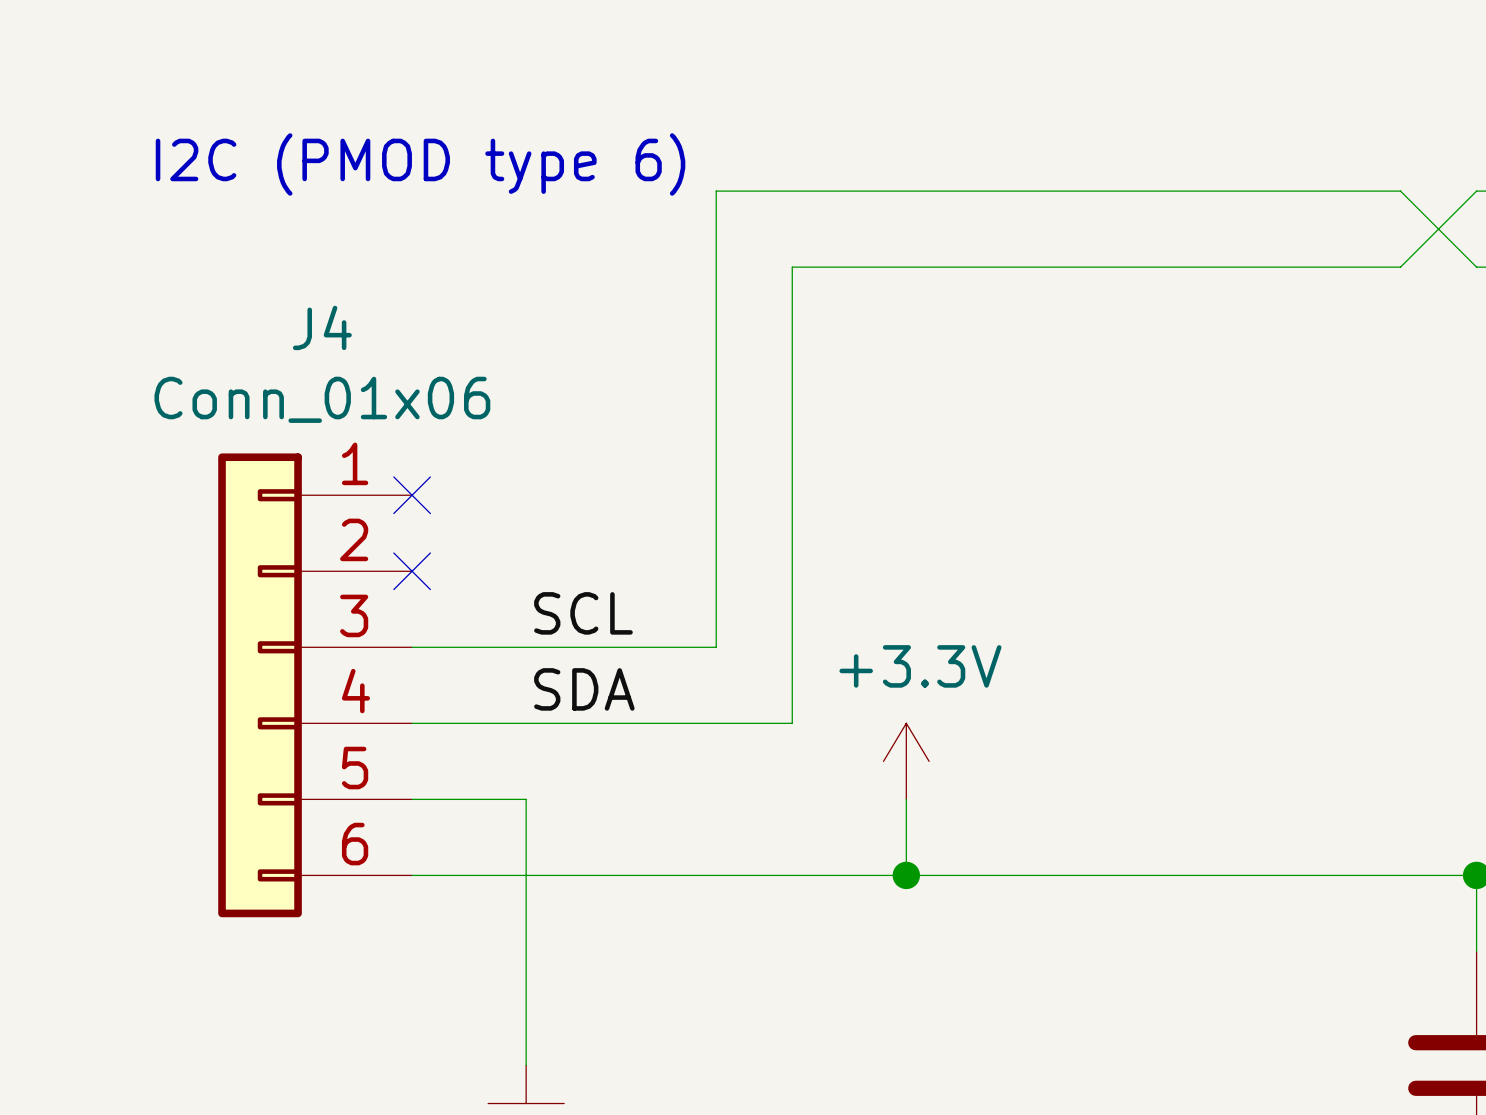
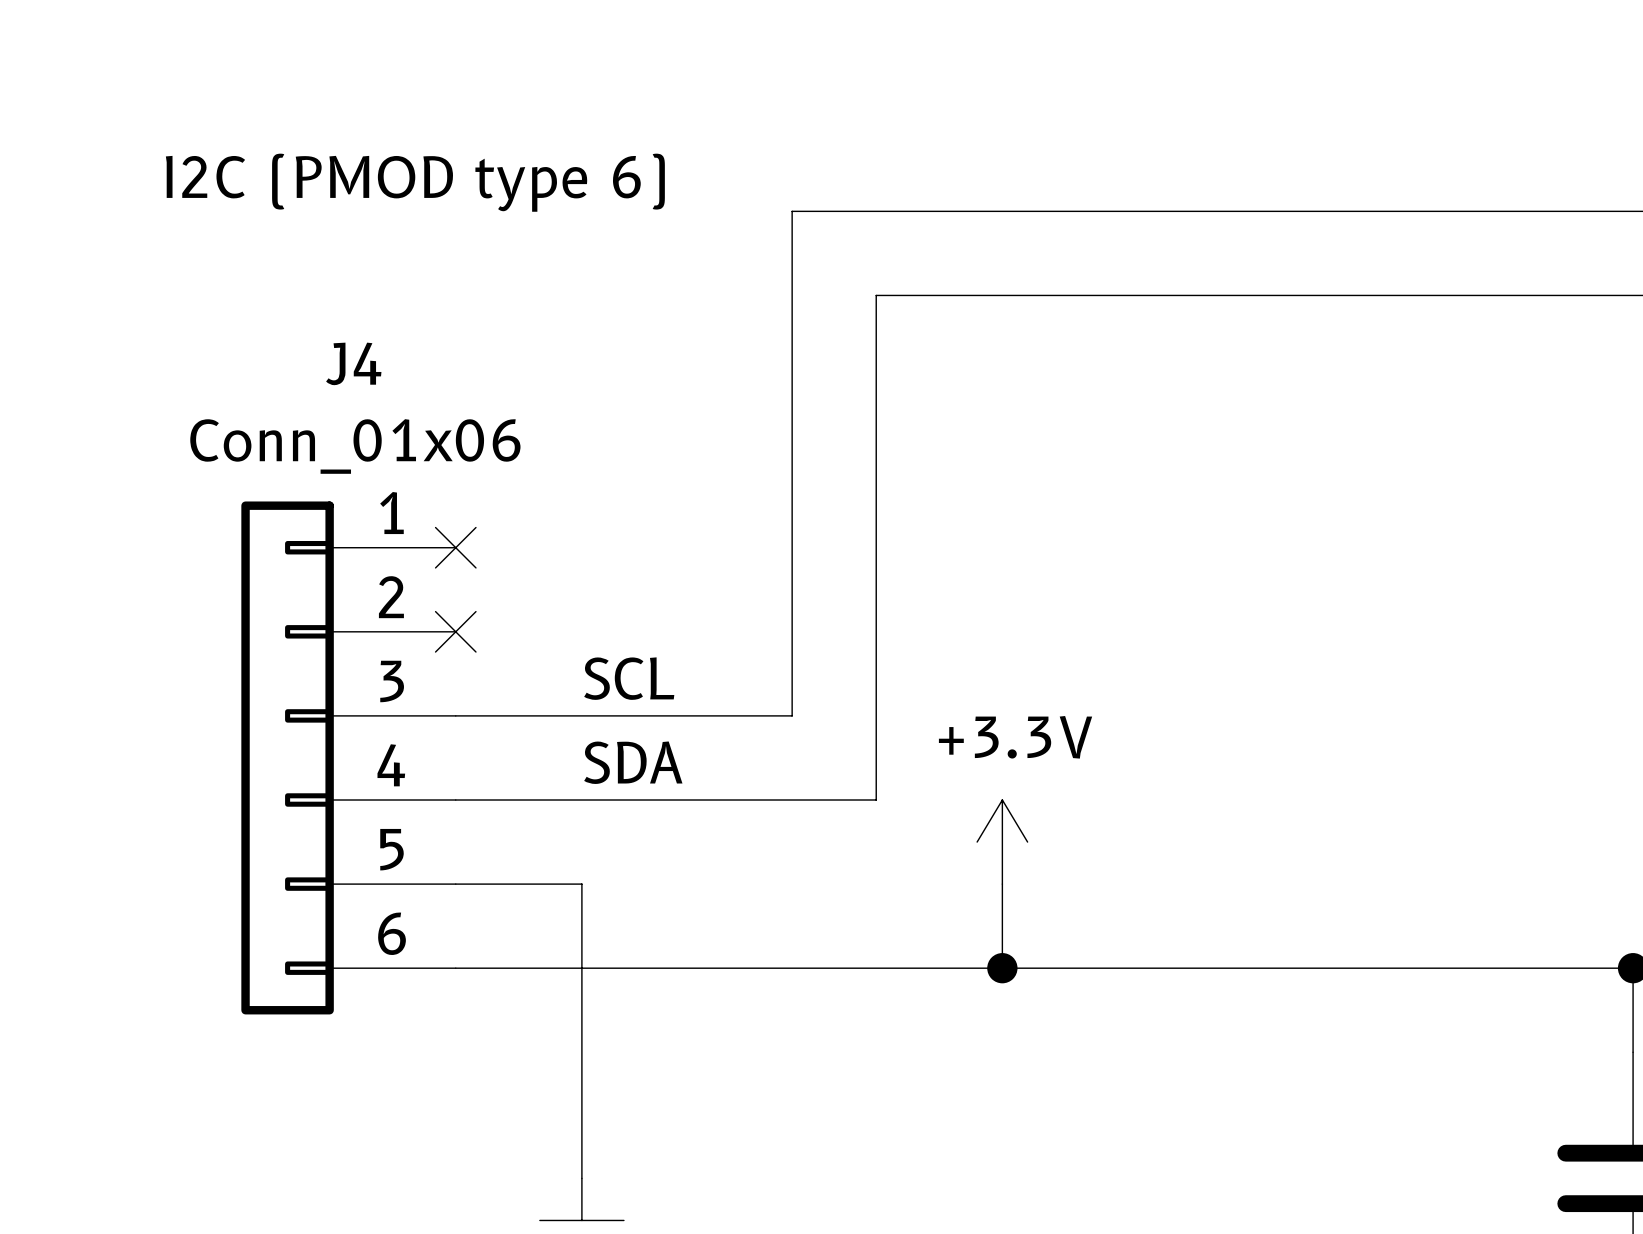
wire: (1400, 191) (1476, 267) -> (1548, 211) (1633, 211)
wire: (1476, 191) (1400, 267) -> (1633, 295) (1548, 295)

